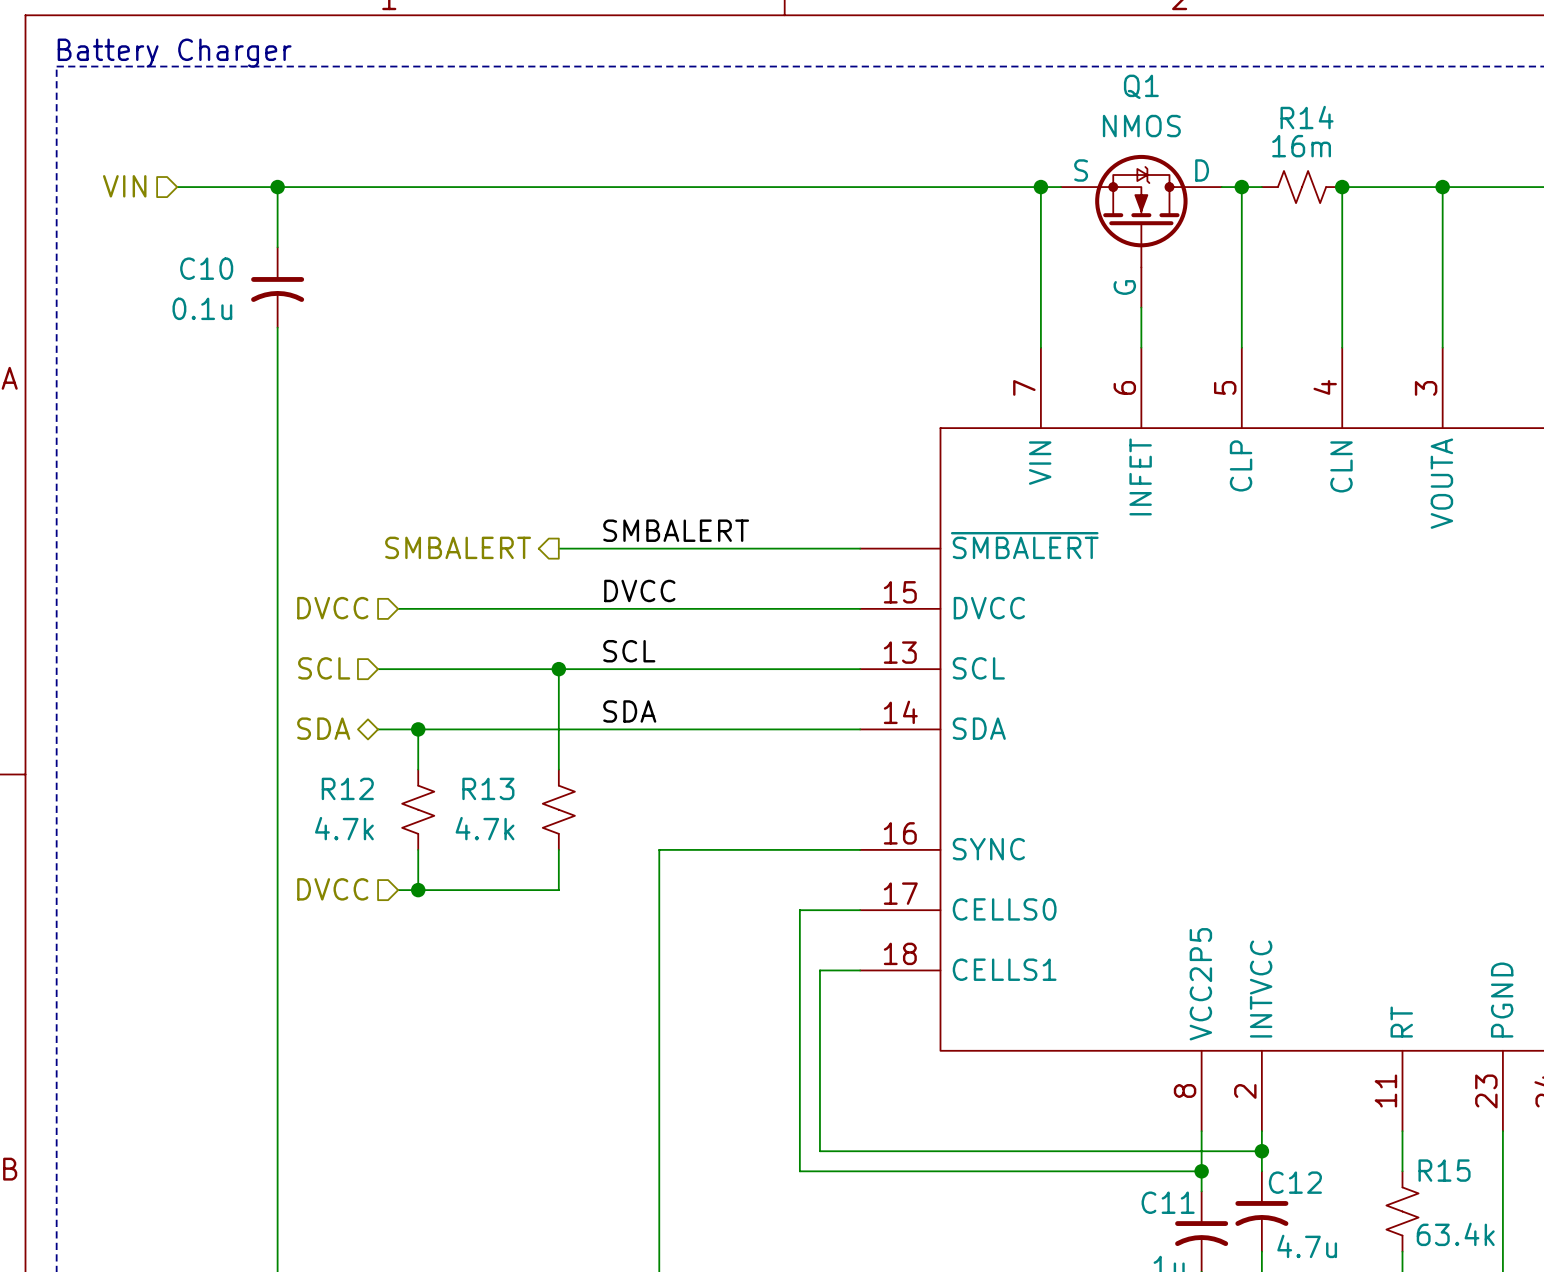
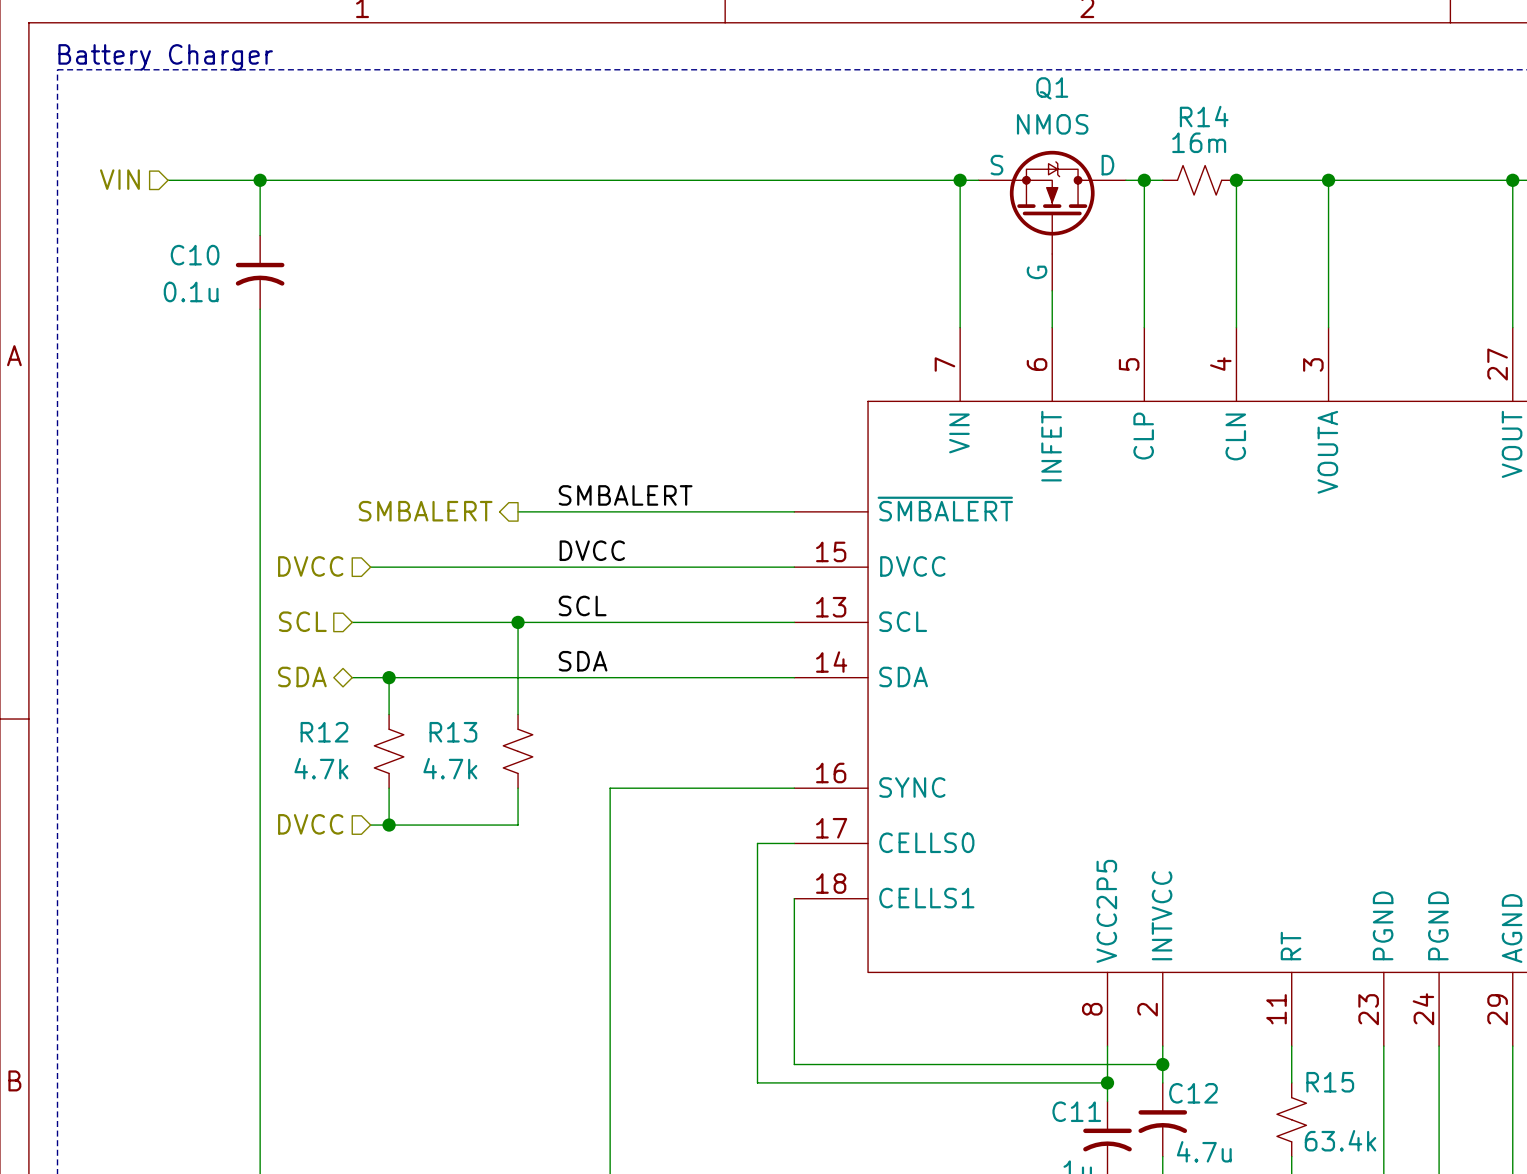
wire: (819, 910) (799, 910) (799, 1171) (819, 1171) -> none
wire: (819, 970) (860, 970) -> (757, 898) (757, 843)
wire: none -> (794, 898) (794, 1064)
wire: (819, 1151) (860, 1151) -> (757, 1064) (757, 1082)

